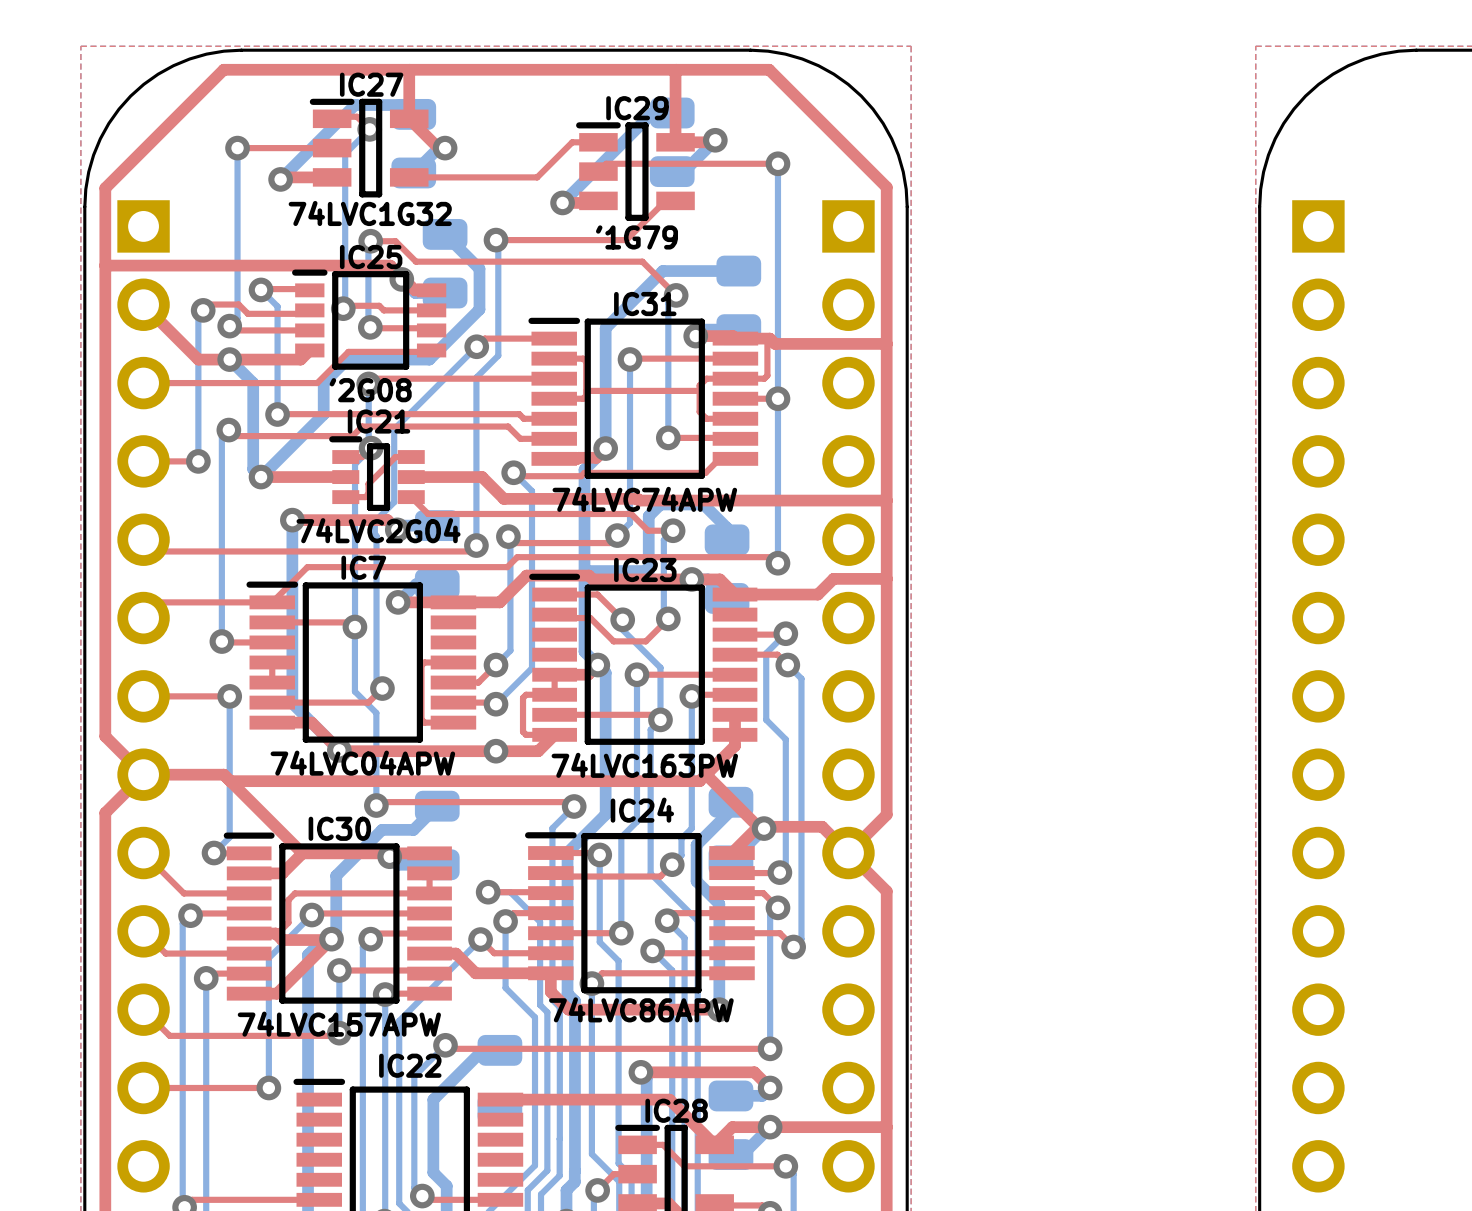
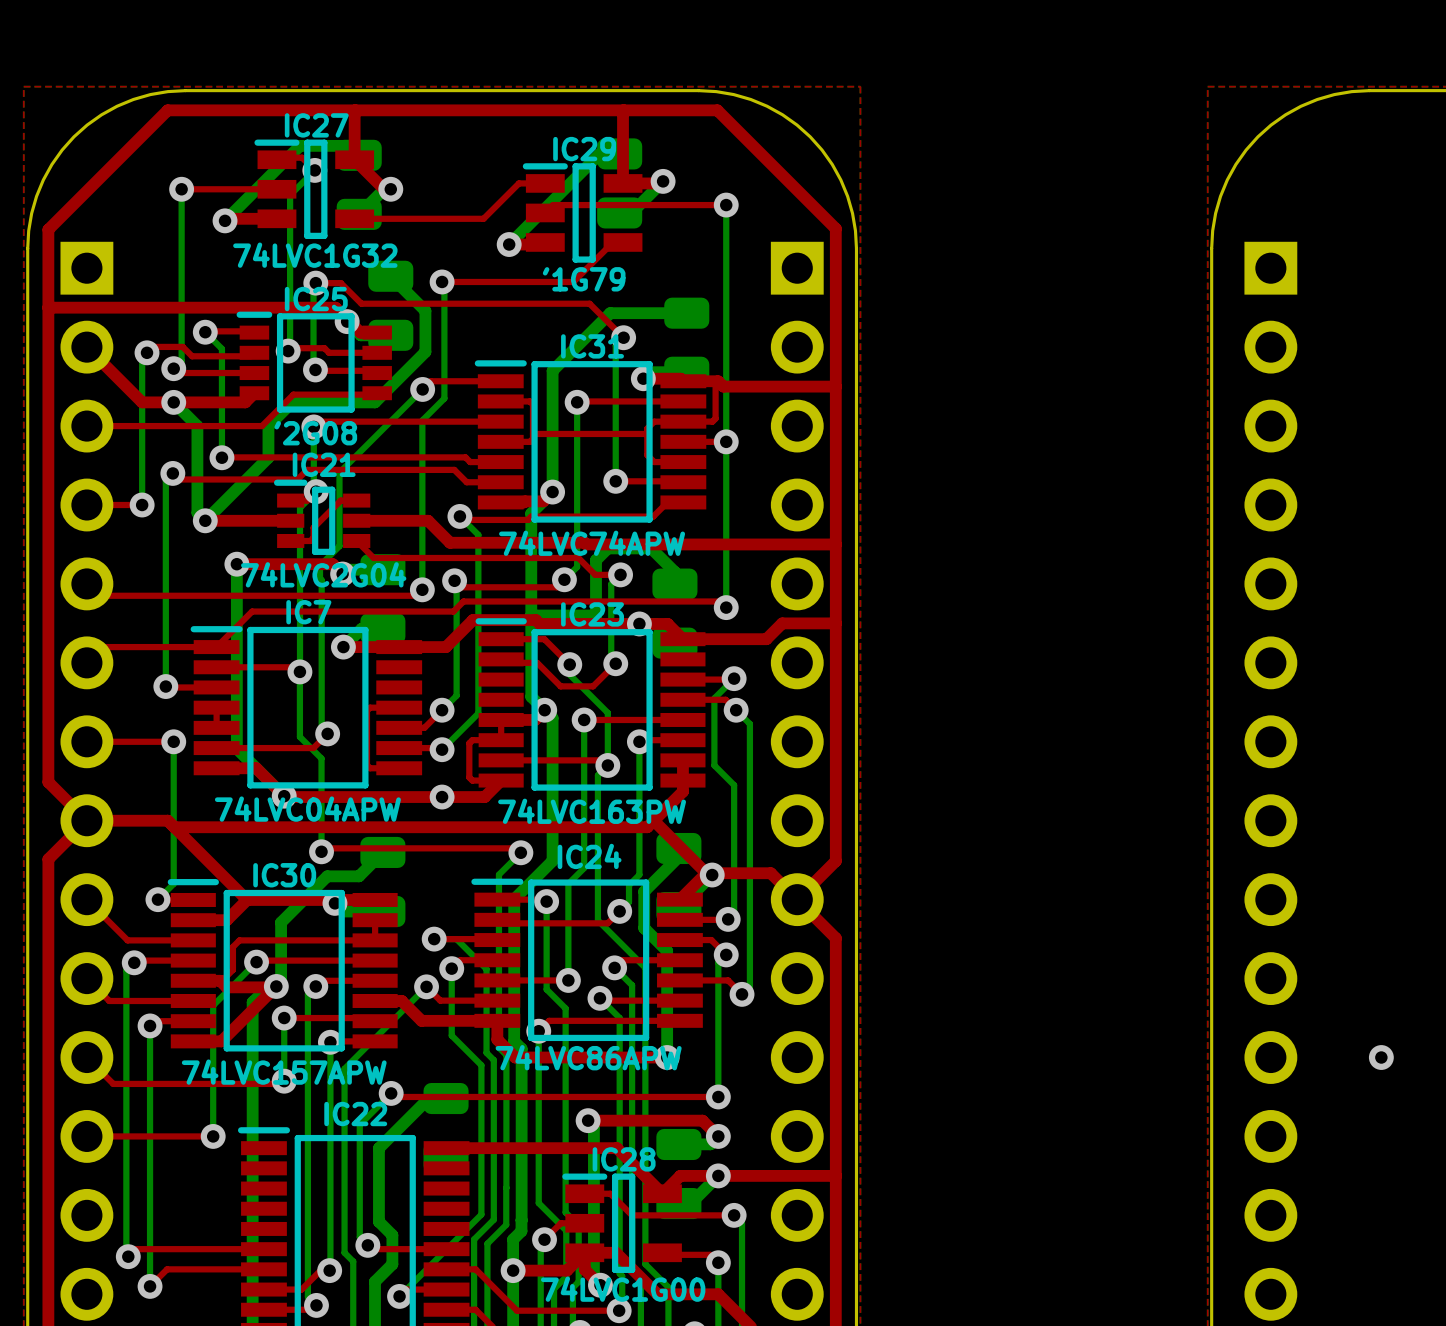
via: none -> (1381, 1057)

